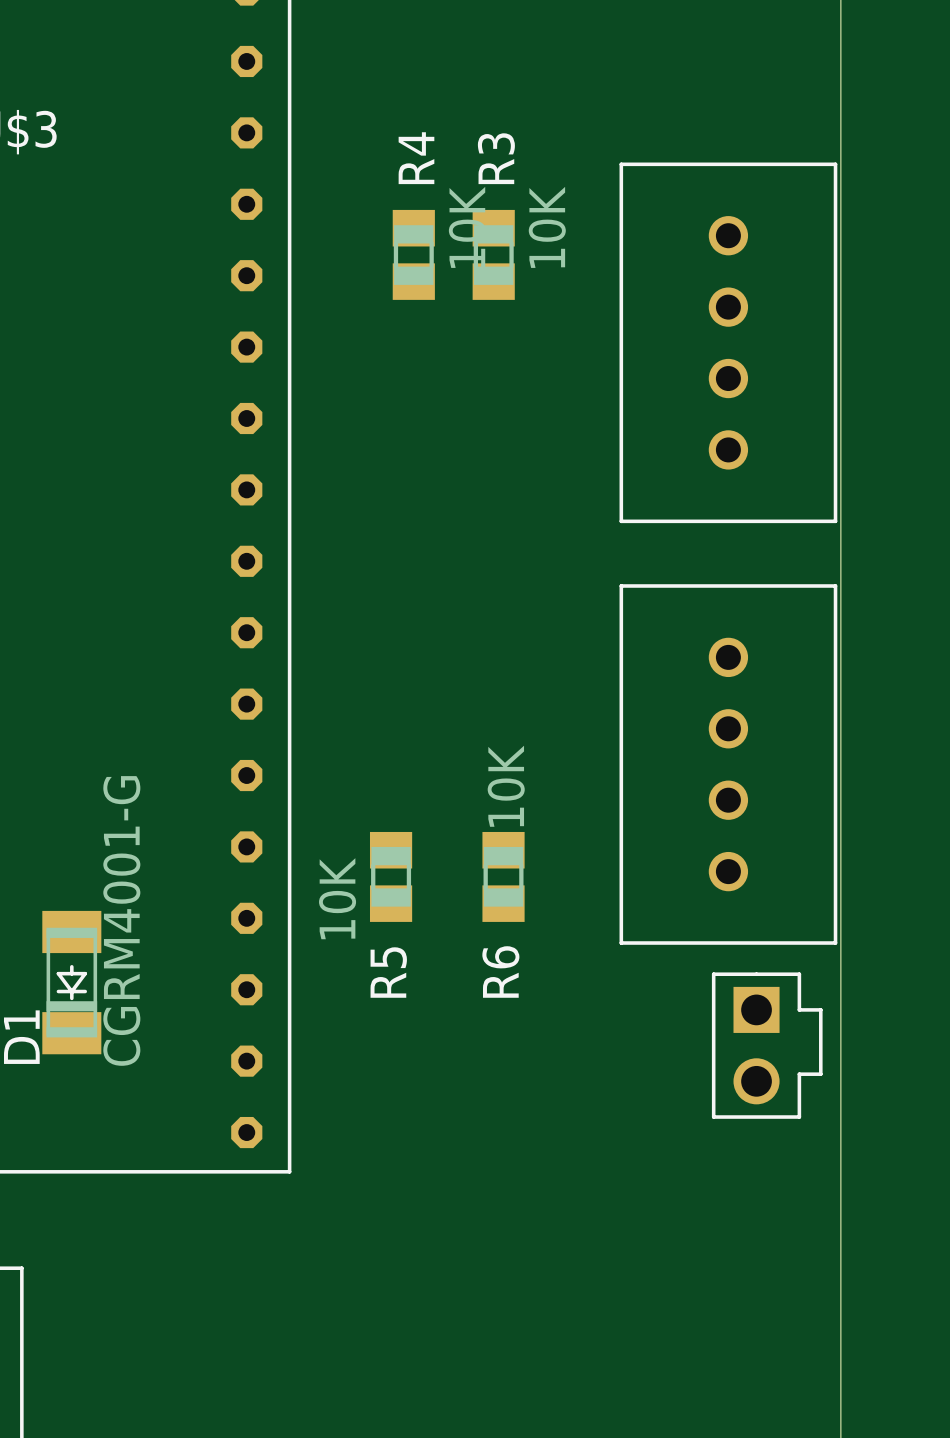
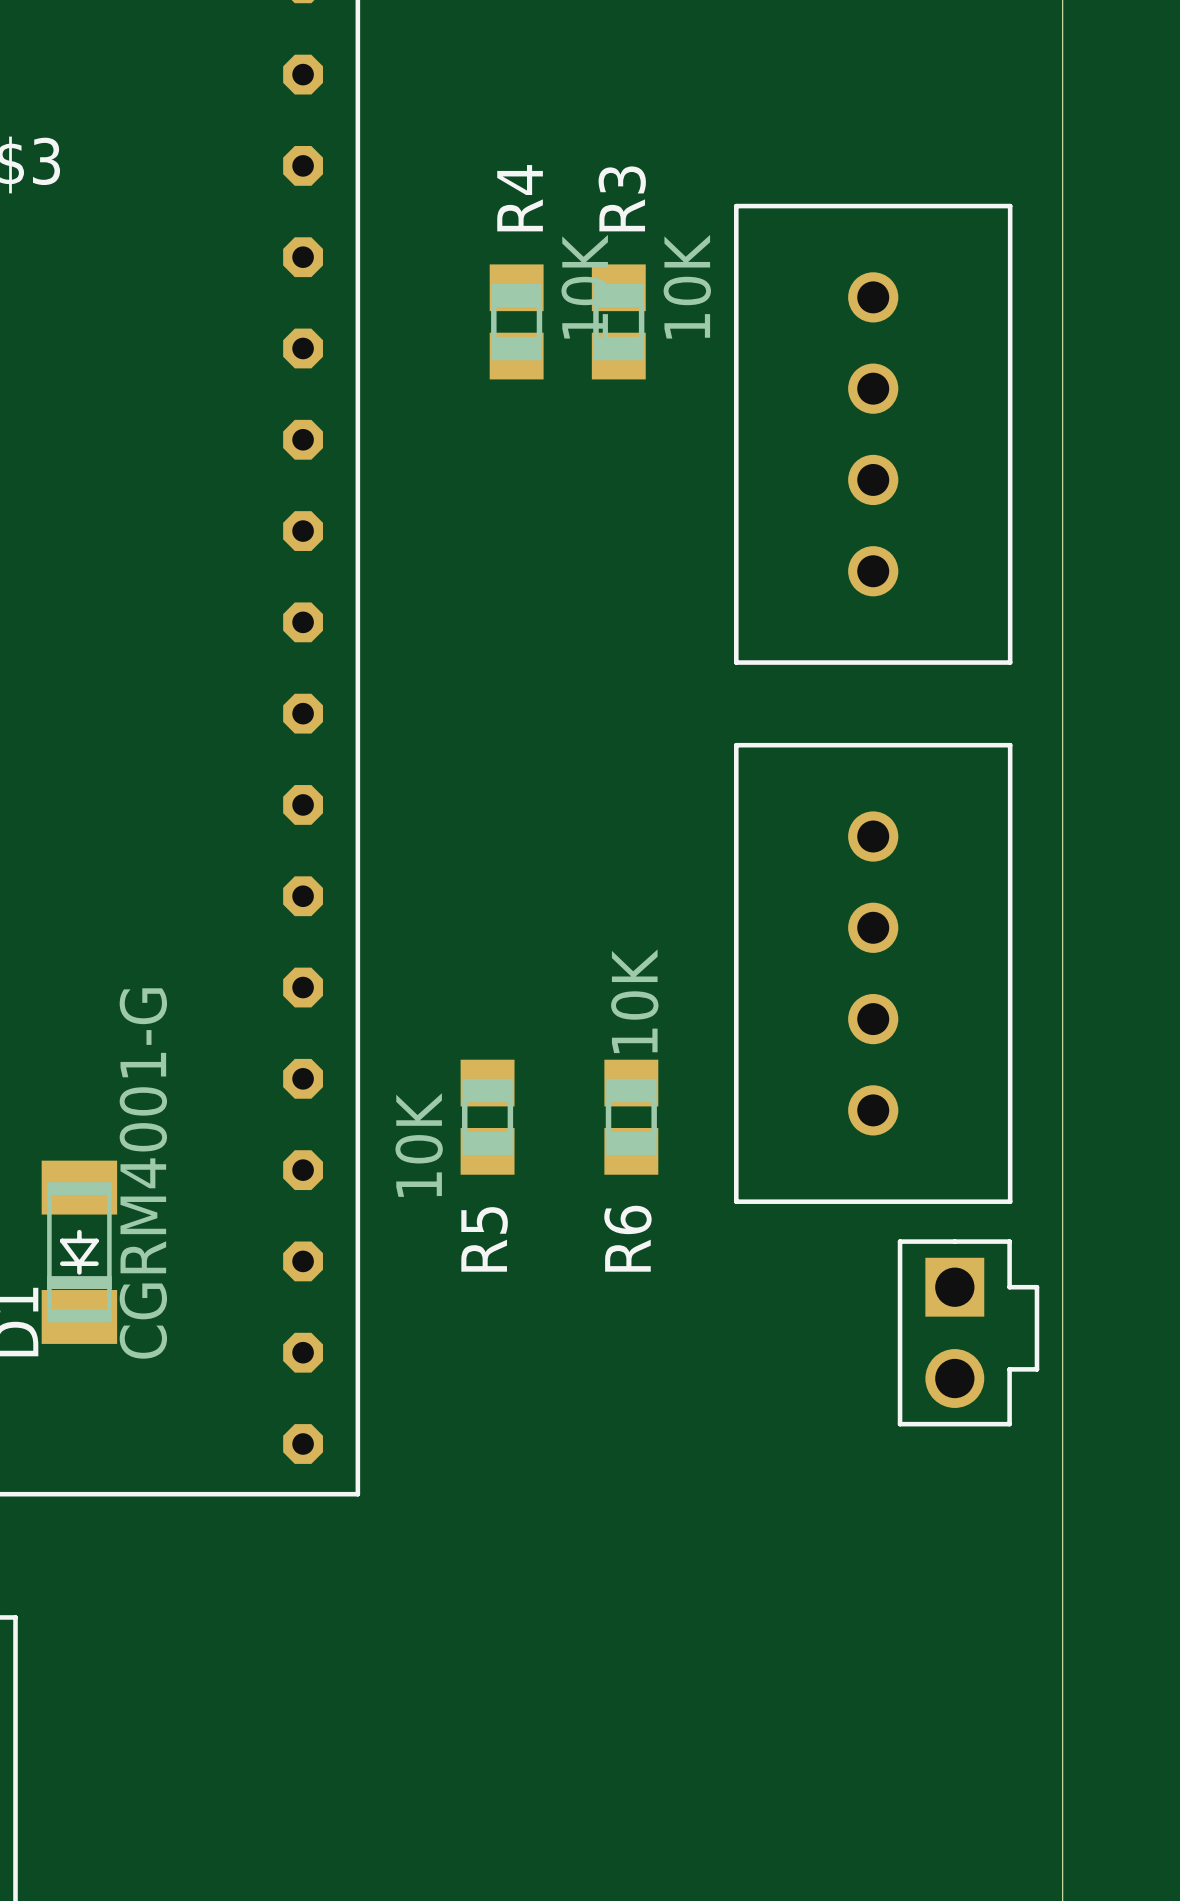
part position: (728, 342) -> (873, 434)
part position: (728, 764) -> (873, 973)

